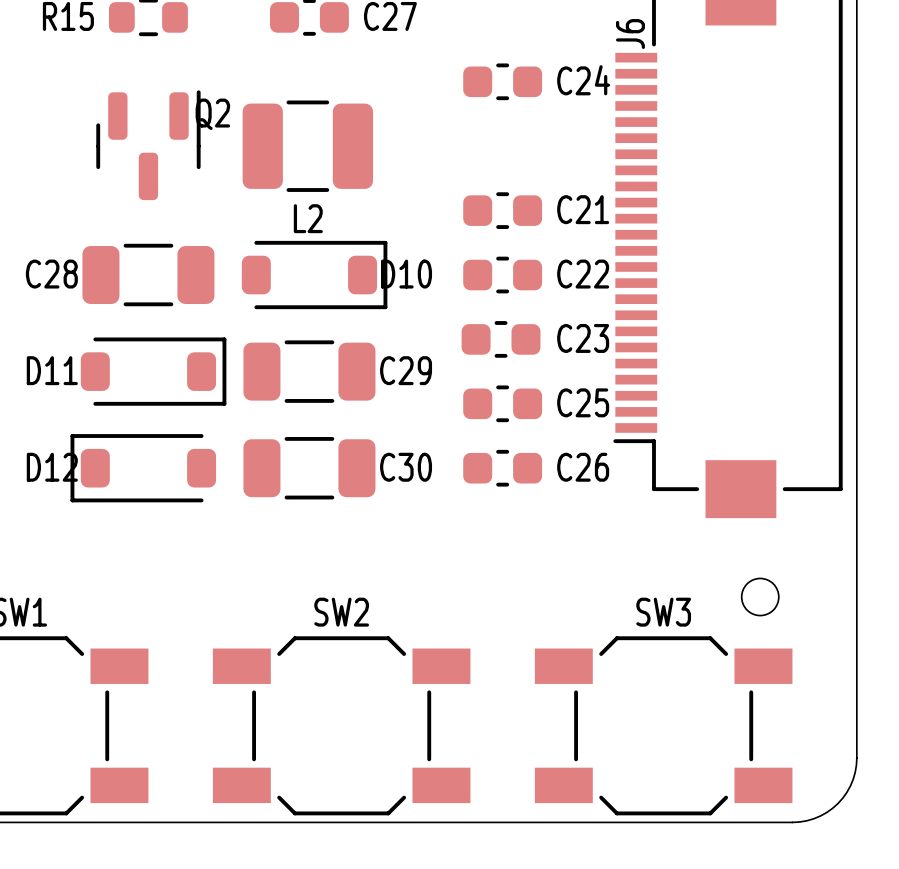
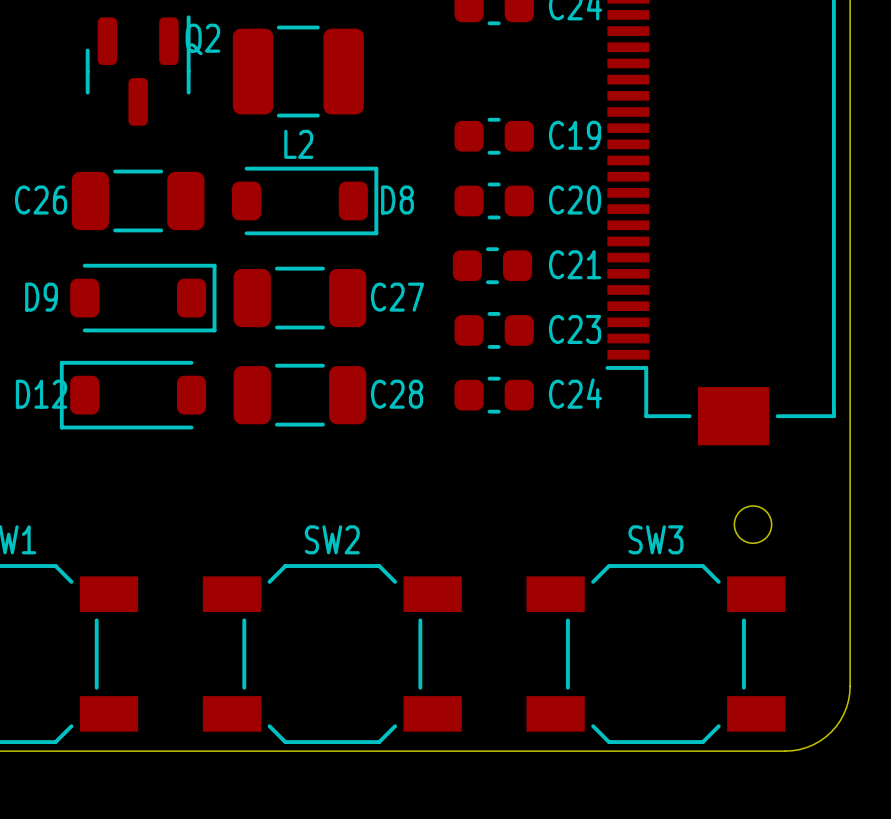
C21 name: C21 (583, 209) -> C19 (575, 135)
C28 name: C28 (51, 274) -> C26 (41, 200)
D10 name: D10 (406, 274) -> D8 (397, 200)
C22 name: C22 (583, 274) -> C20 (575, 200)
C23 name: C23 (583, 338) -> C21 (575, 264)
D11 name: D11 (52, 370) -> D9 (41, 297)
C29 name: C29 (406, 370) -> C27 (397, 297)
C25 name: C25 (583, 402) -> C23 (575, 329)
C30 name: C30 (406, 467) -> C28 (397, 394)
C26 name: C26 (583, 467) -> C24 (575, 393)

